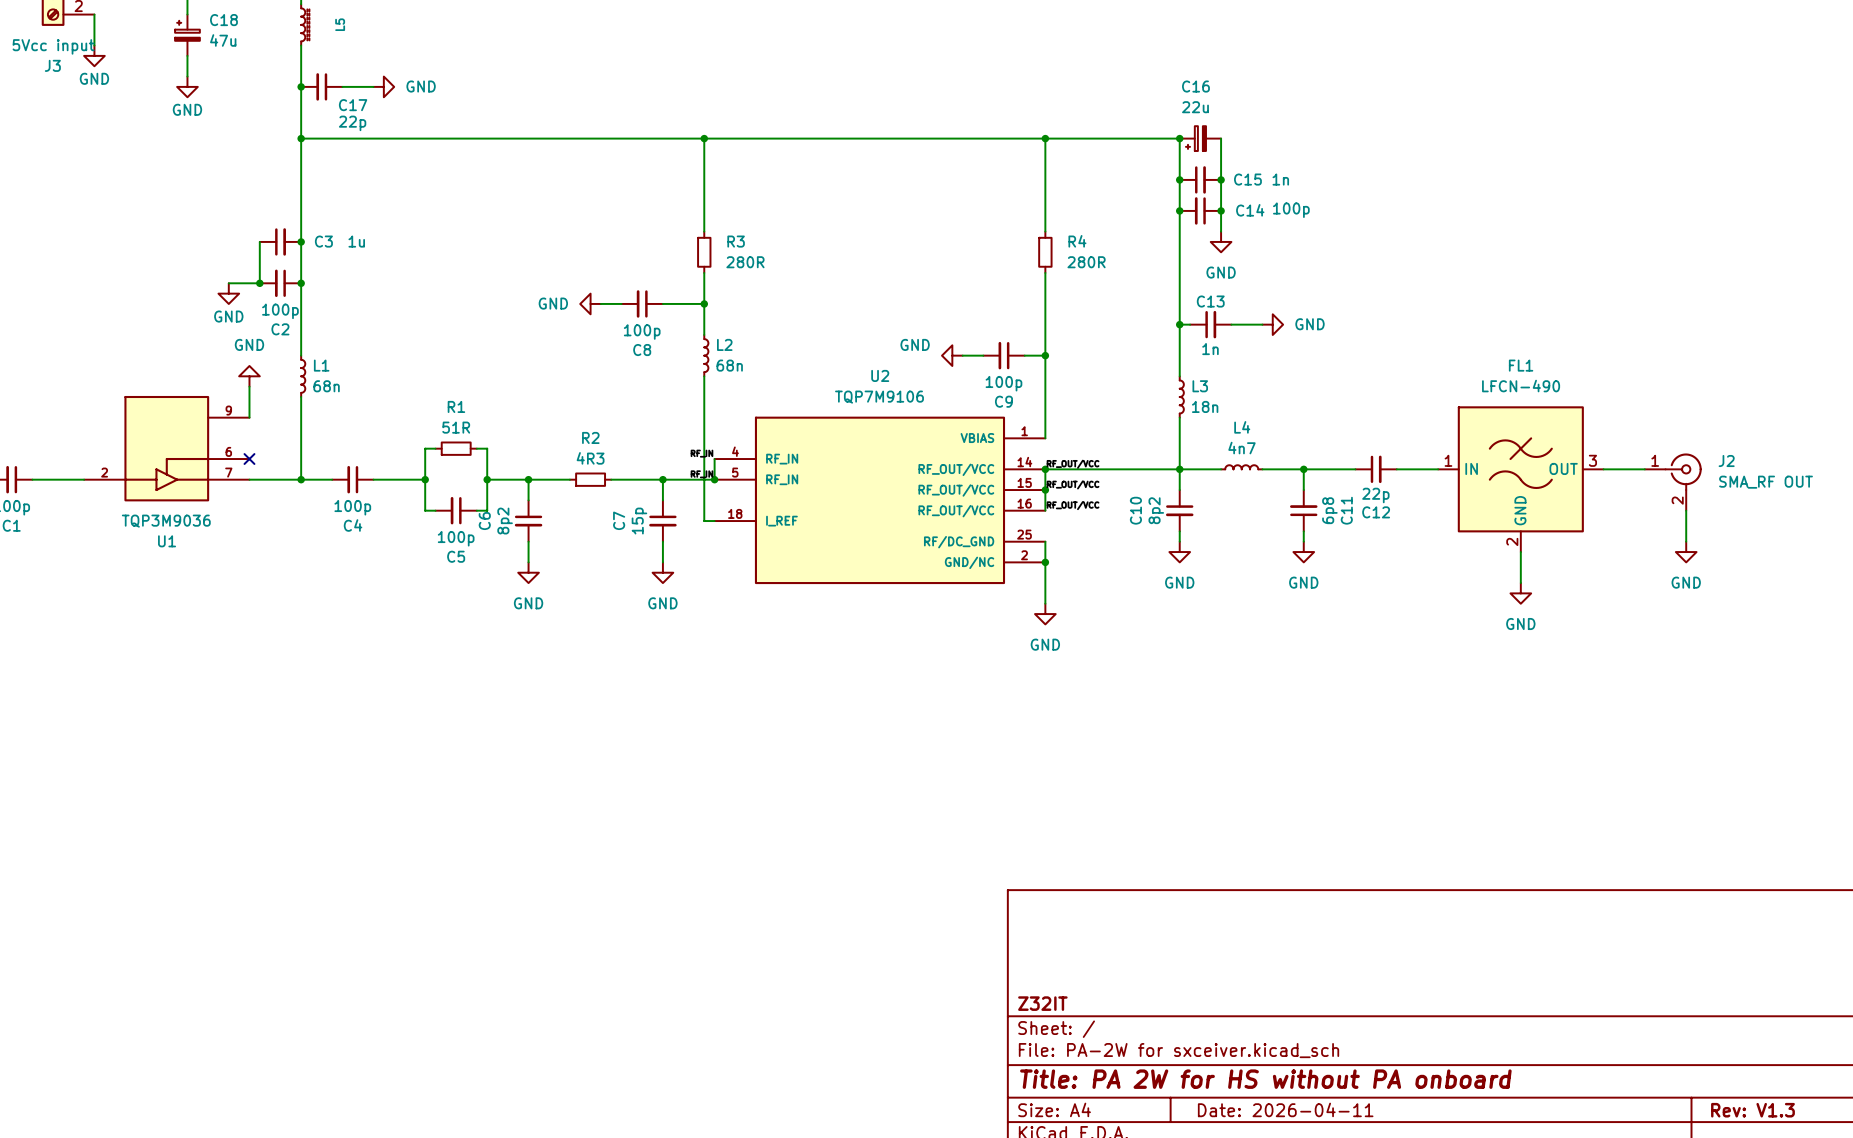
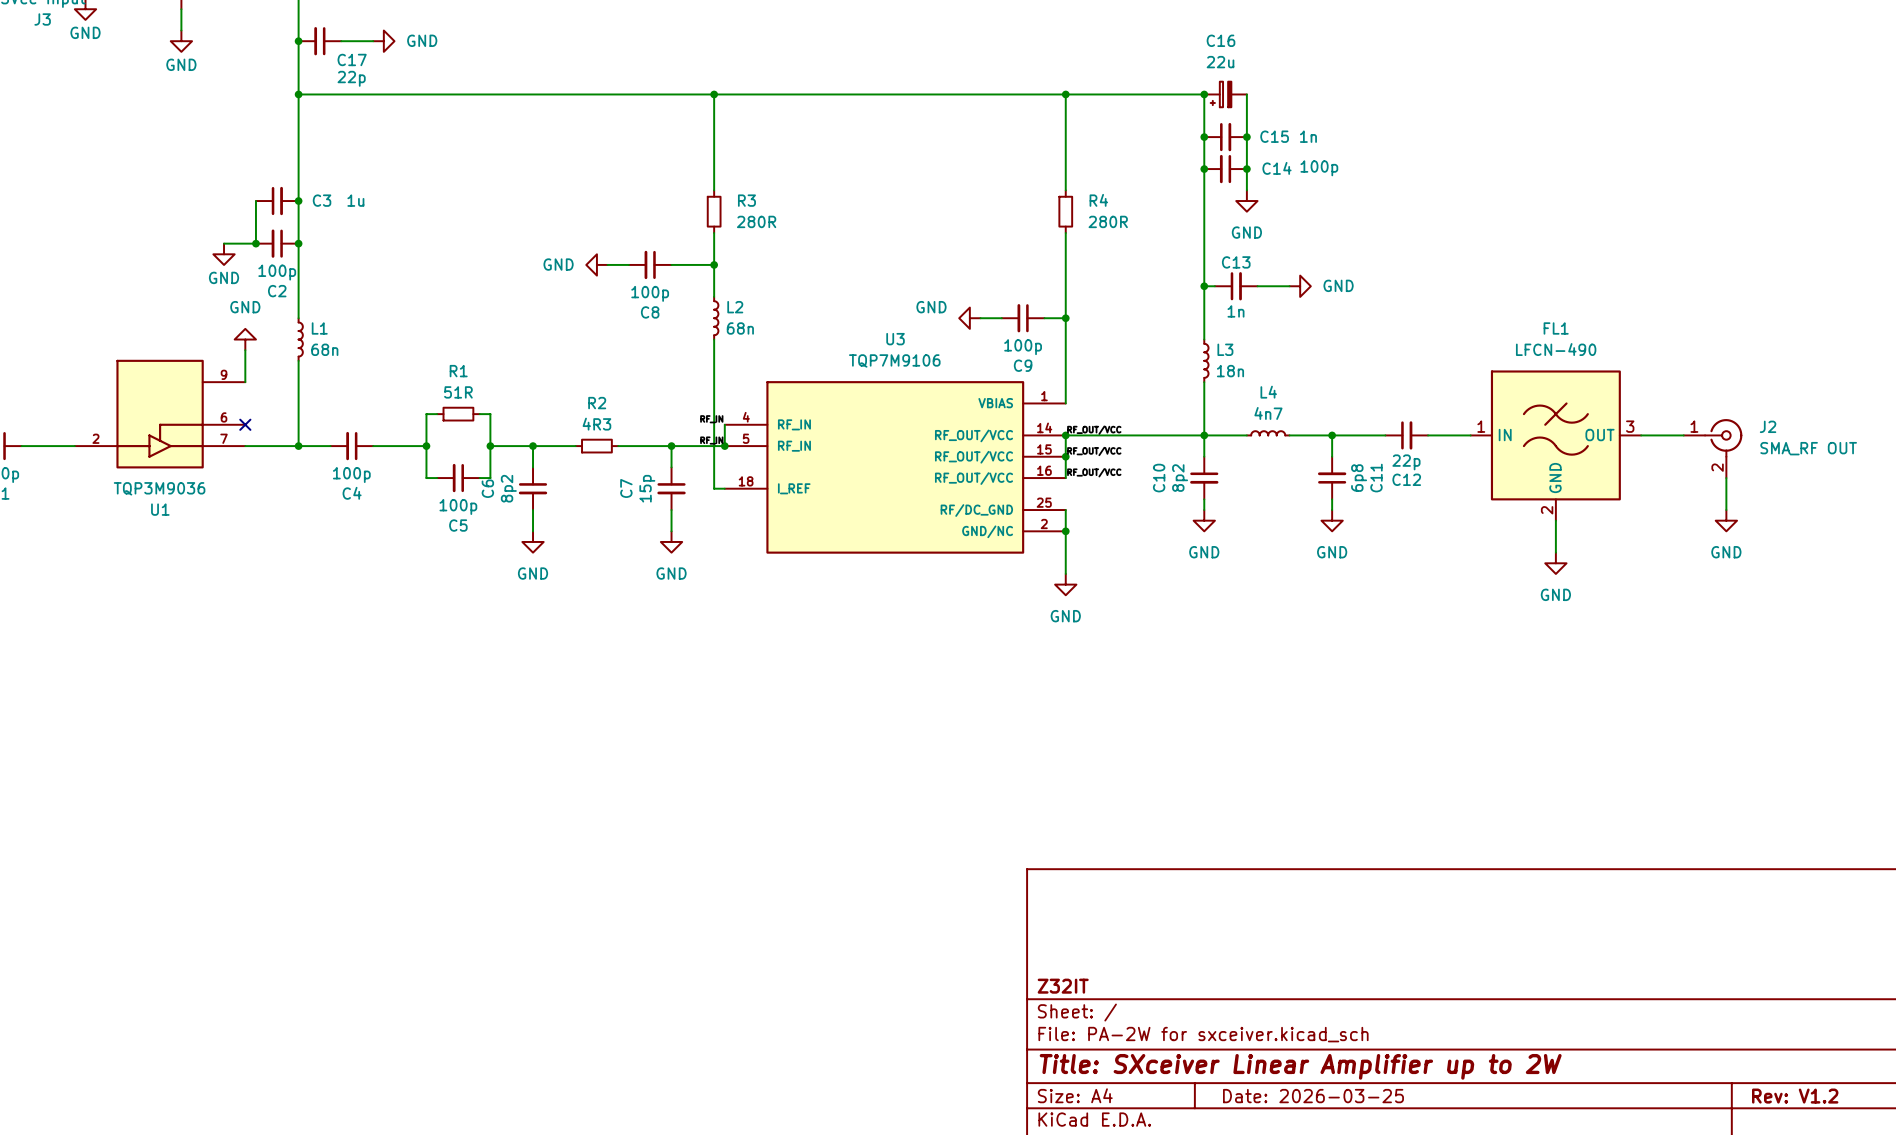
U2 name: U2 (880, 375) -> U3 (895, 339)
title block: Title: PA 2W for HS without PA onboard (1265, 1079) -> Title: SXceiver Linear Amplifier up to 2W (1300, 1066)
title block: Date: 2026-04-11 (1285, 1109) -> Date: 2026-03-25 (1313, 1096)
title block: Rev: V1.3 (1752, 1110) -> Rev: V1.2 (1795, 1096)

